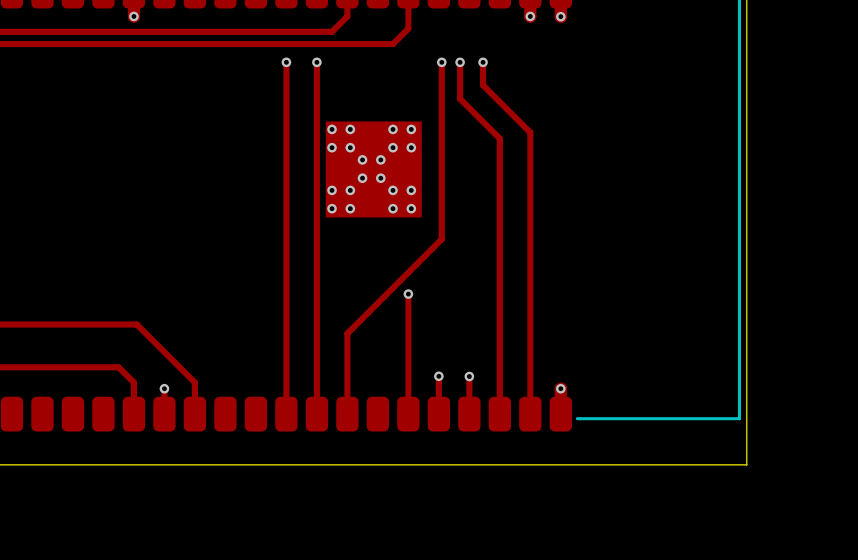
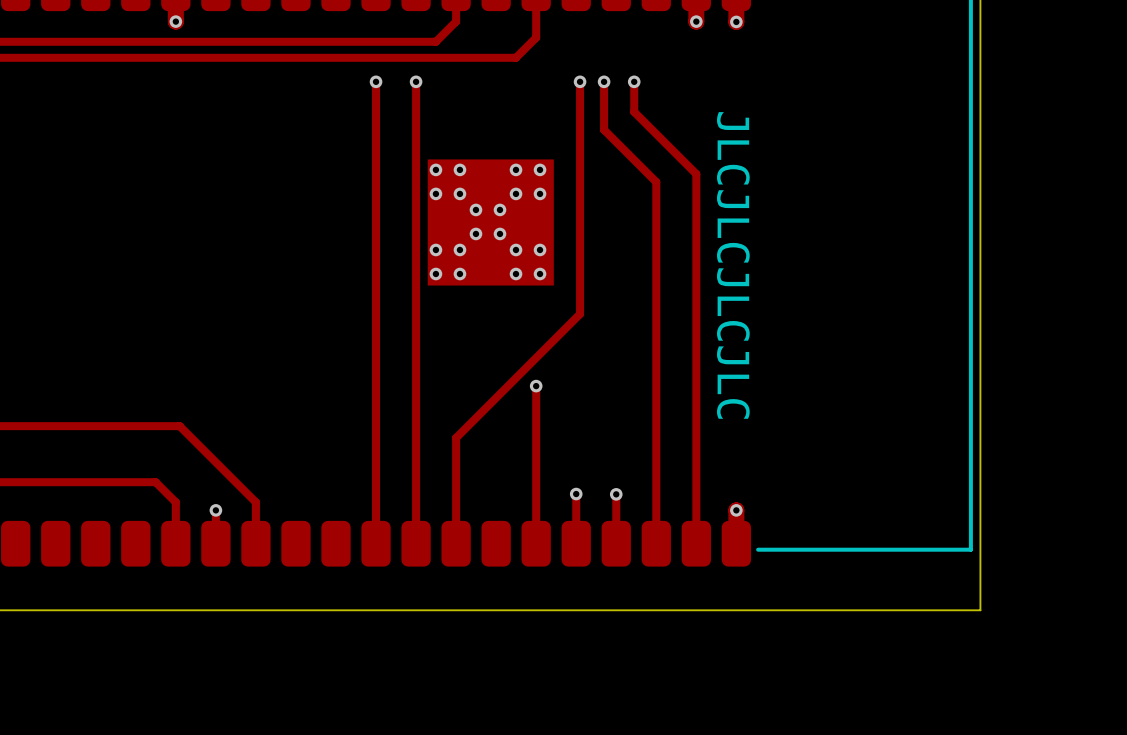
text: none -> JLCJLCJLCJLC (733, 265)

